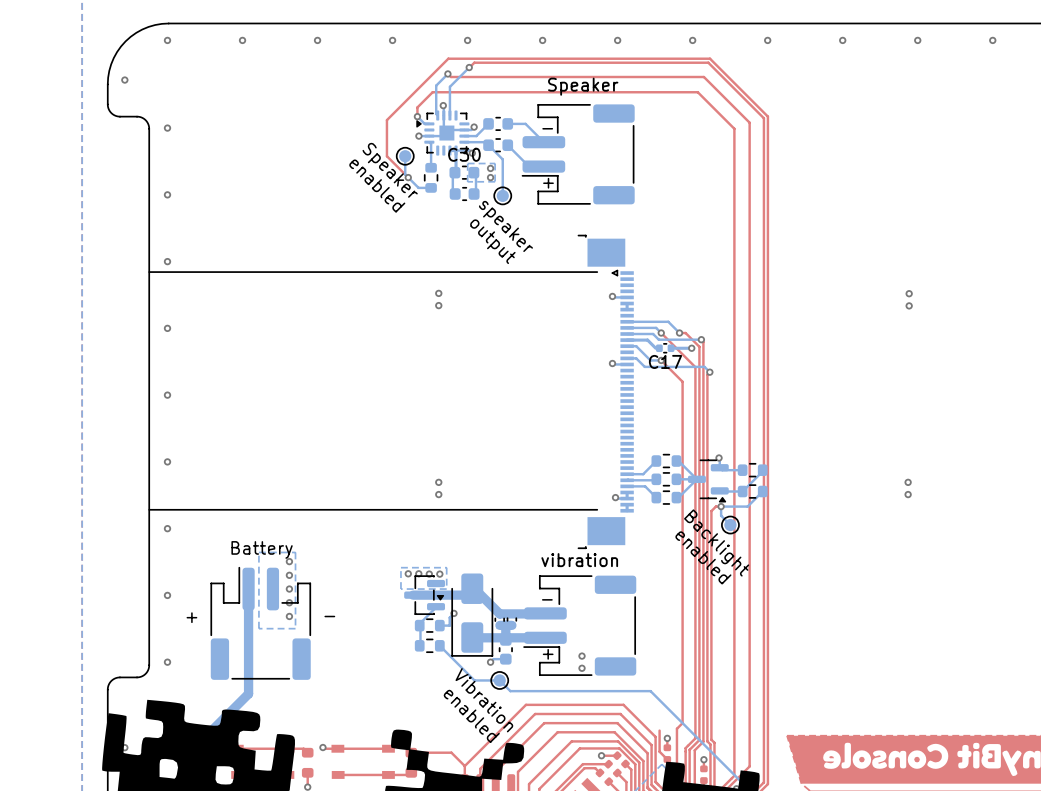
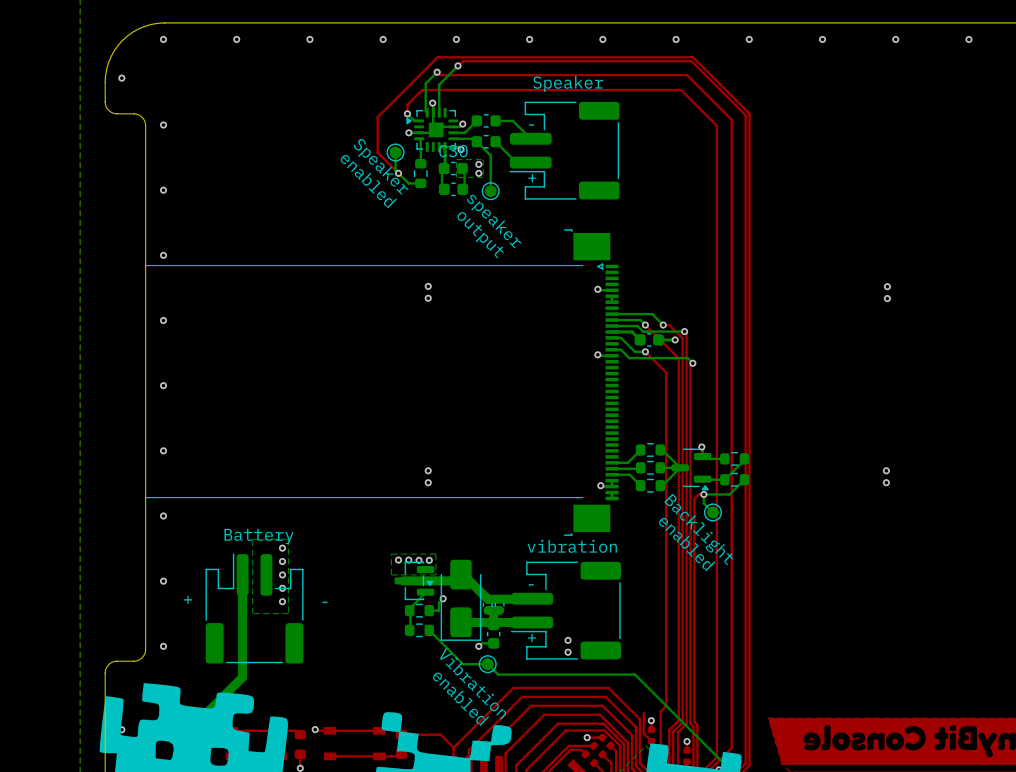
C17: (665, 348) -> none
part: none -> (649, 339)

